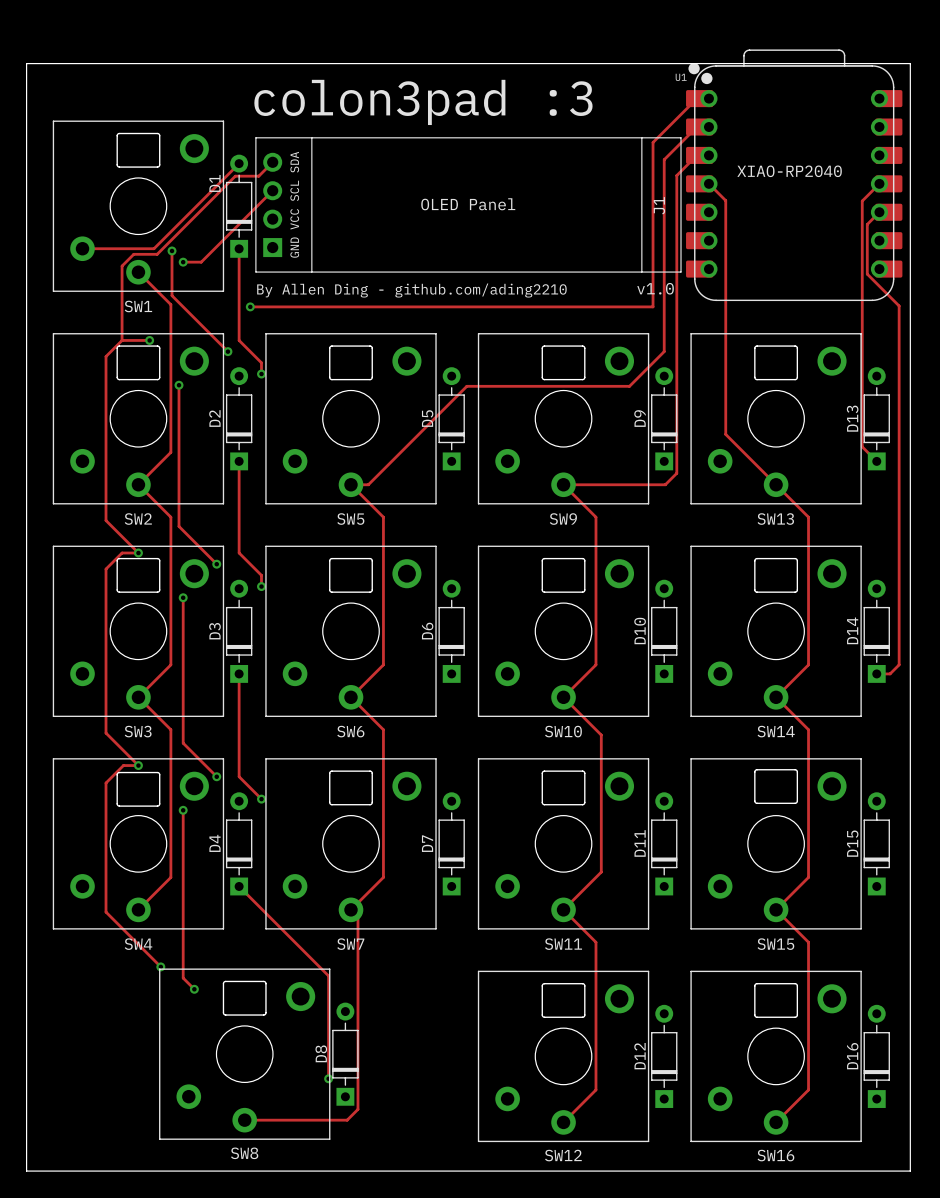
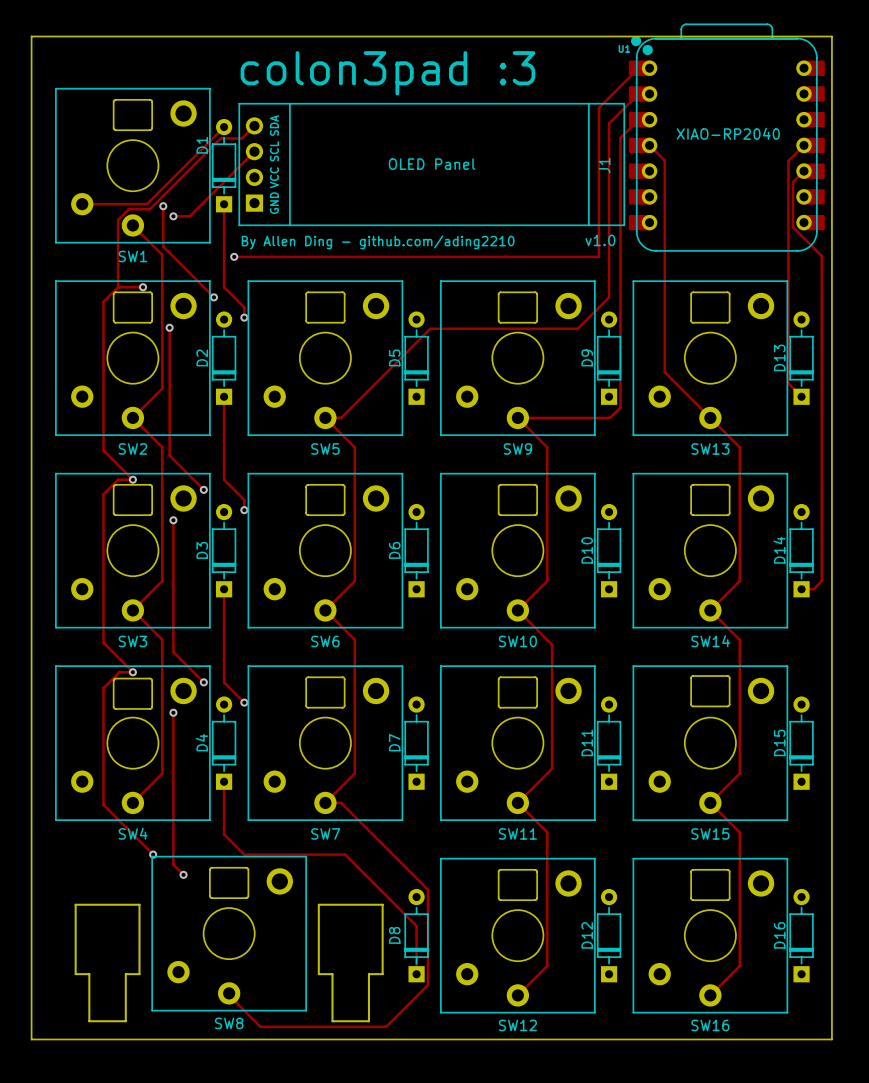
track: (239, 886) (328, 975) (328, 1078) -> (224, 781) (224, 834) (244, 854) (345, 854) (416, 926) (416, 974)
track: (350, 909) (357, 916) (357, 1109) (347, 1120) (244, 1120) -> (325, 802) (341, 802) (427, 889) (427, 985) (386, 1026) (260, 1026) (229, 995)
drawing: none -> [74, 903, 384, 1023]
D8 position: (345, 1054) -> (416, 935)
via: (328, 1078) -> none

